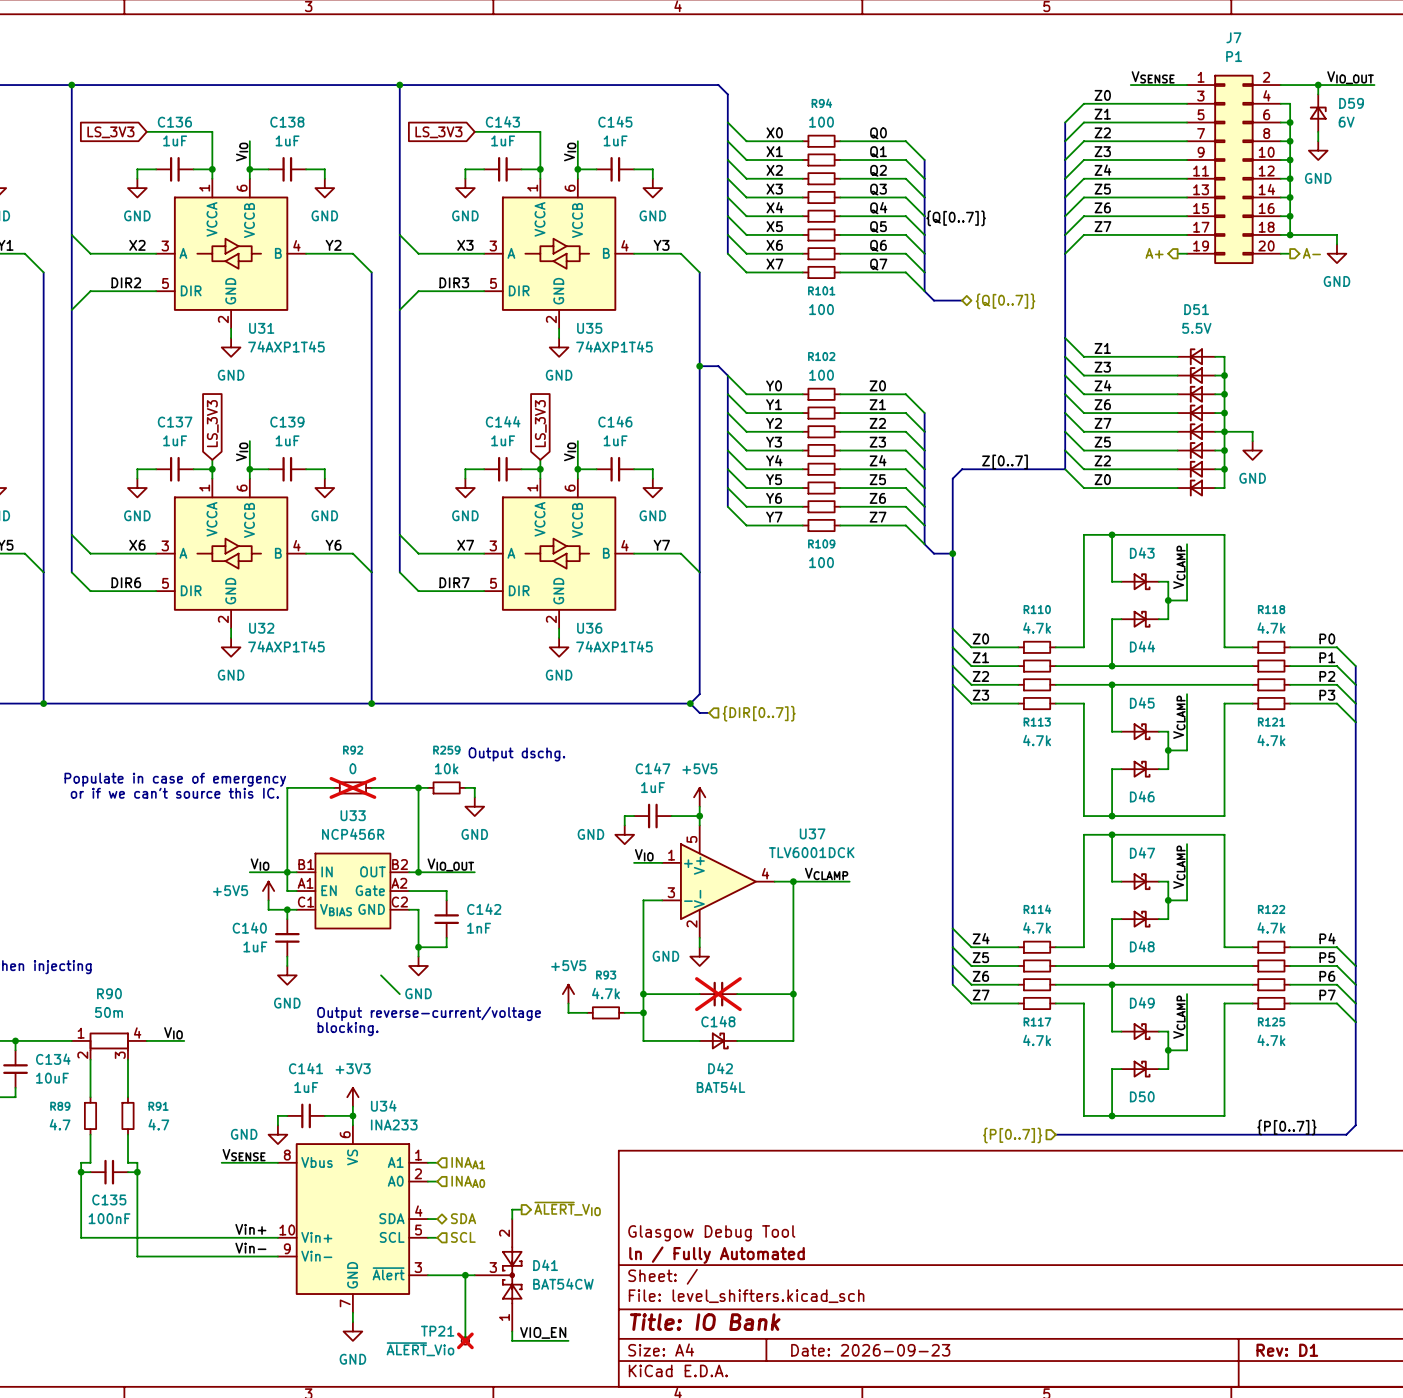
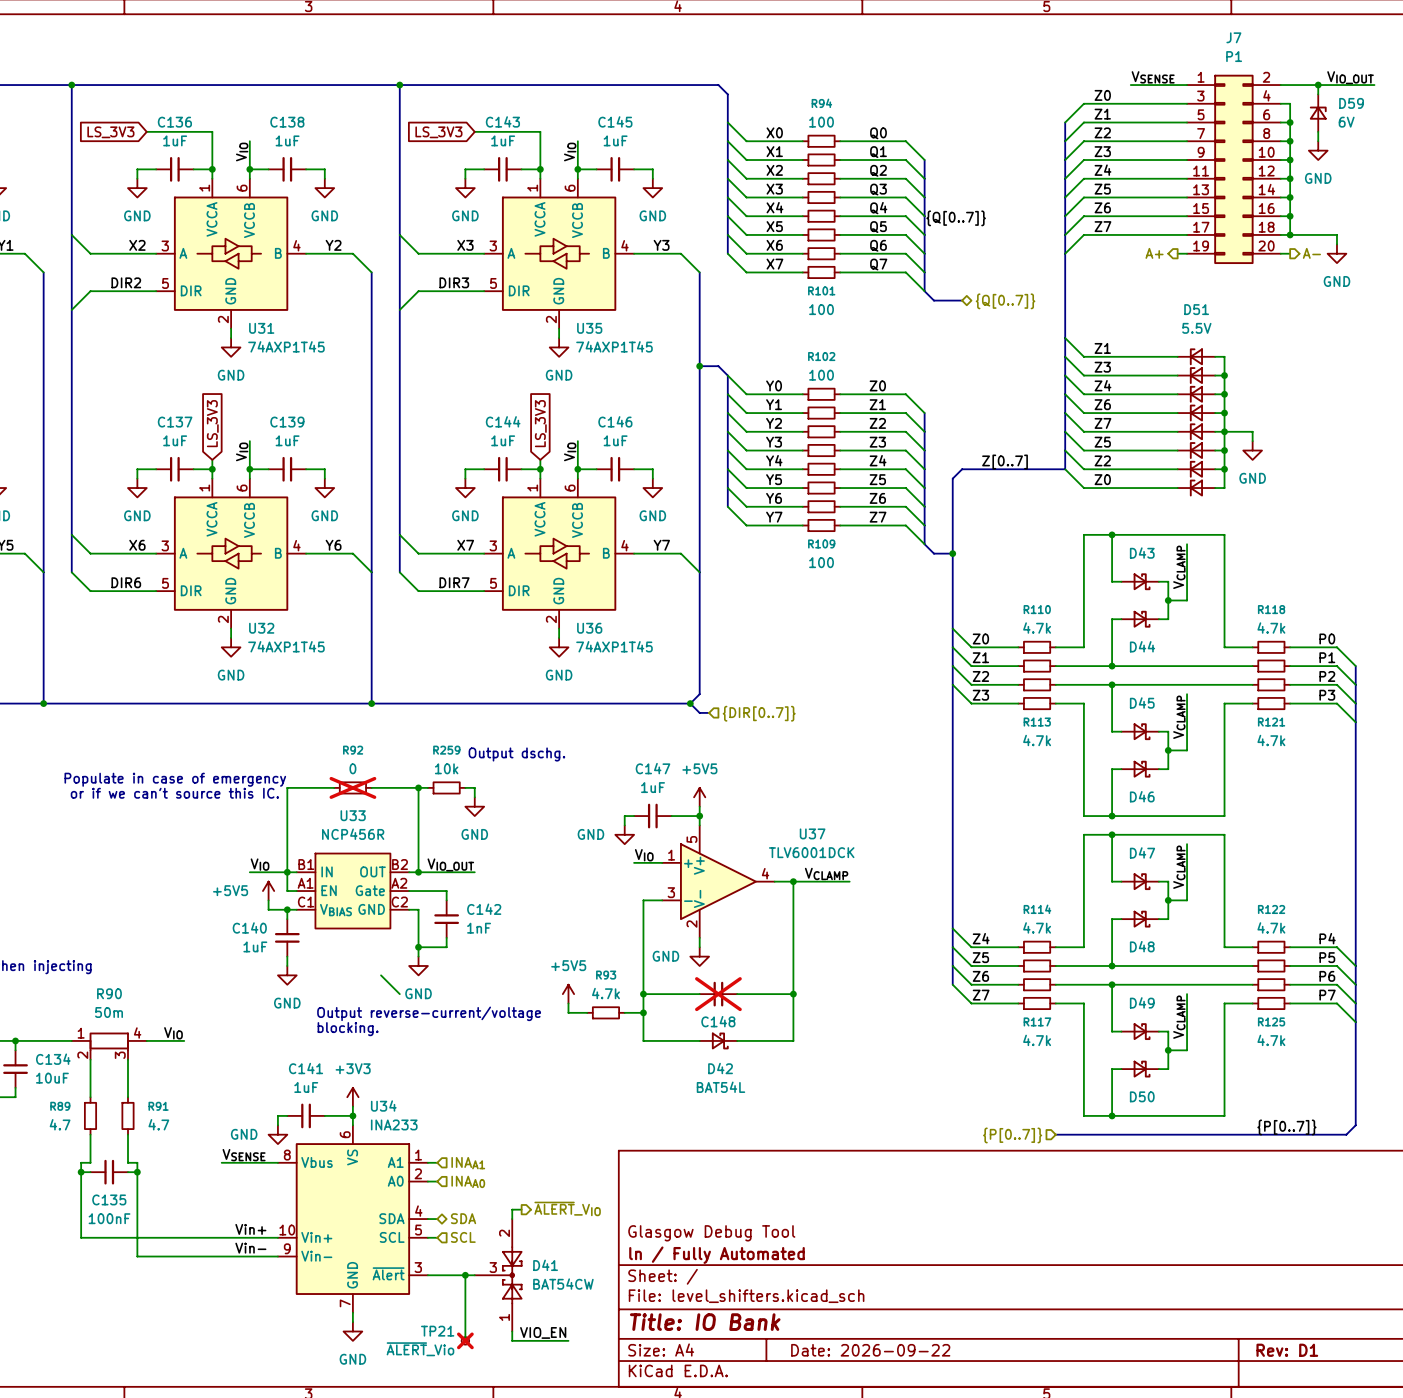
title block: Date: 2026-09-23 (870, 1350) -> Date: 2026-09-22 (870, 1350)

